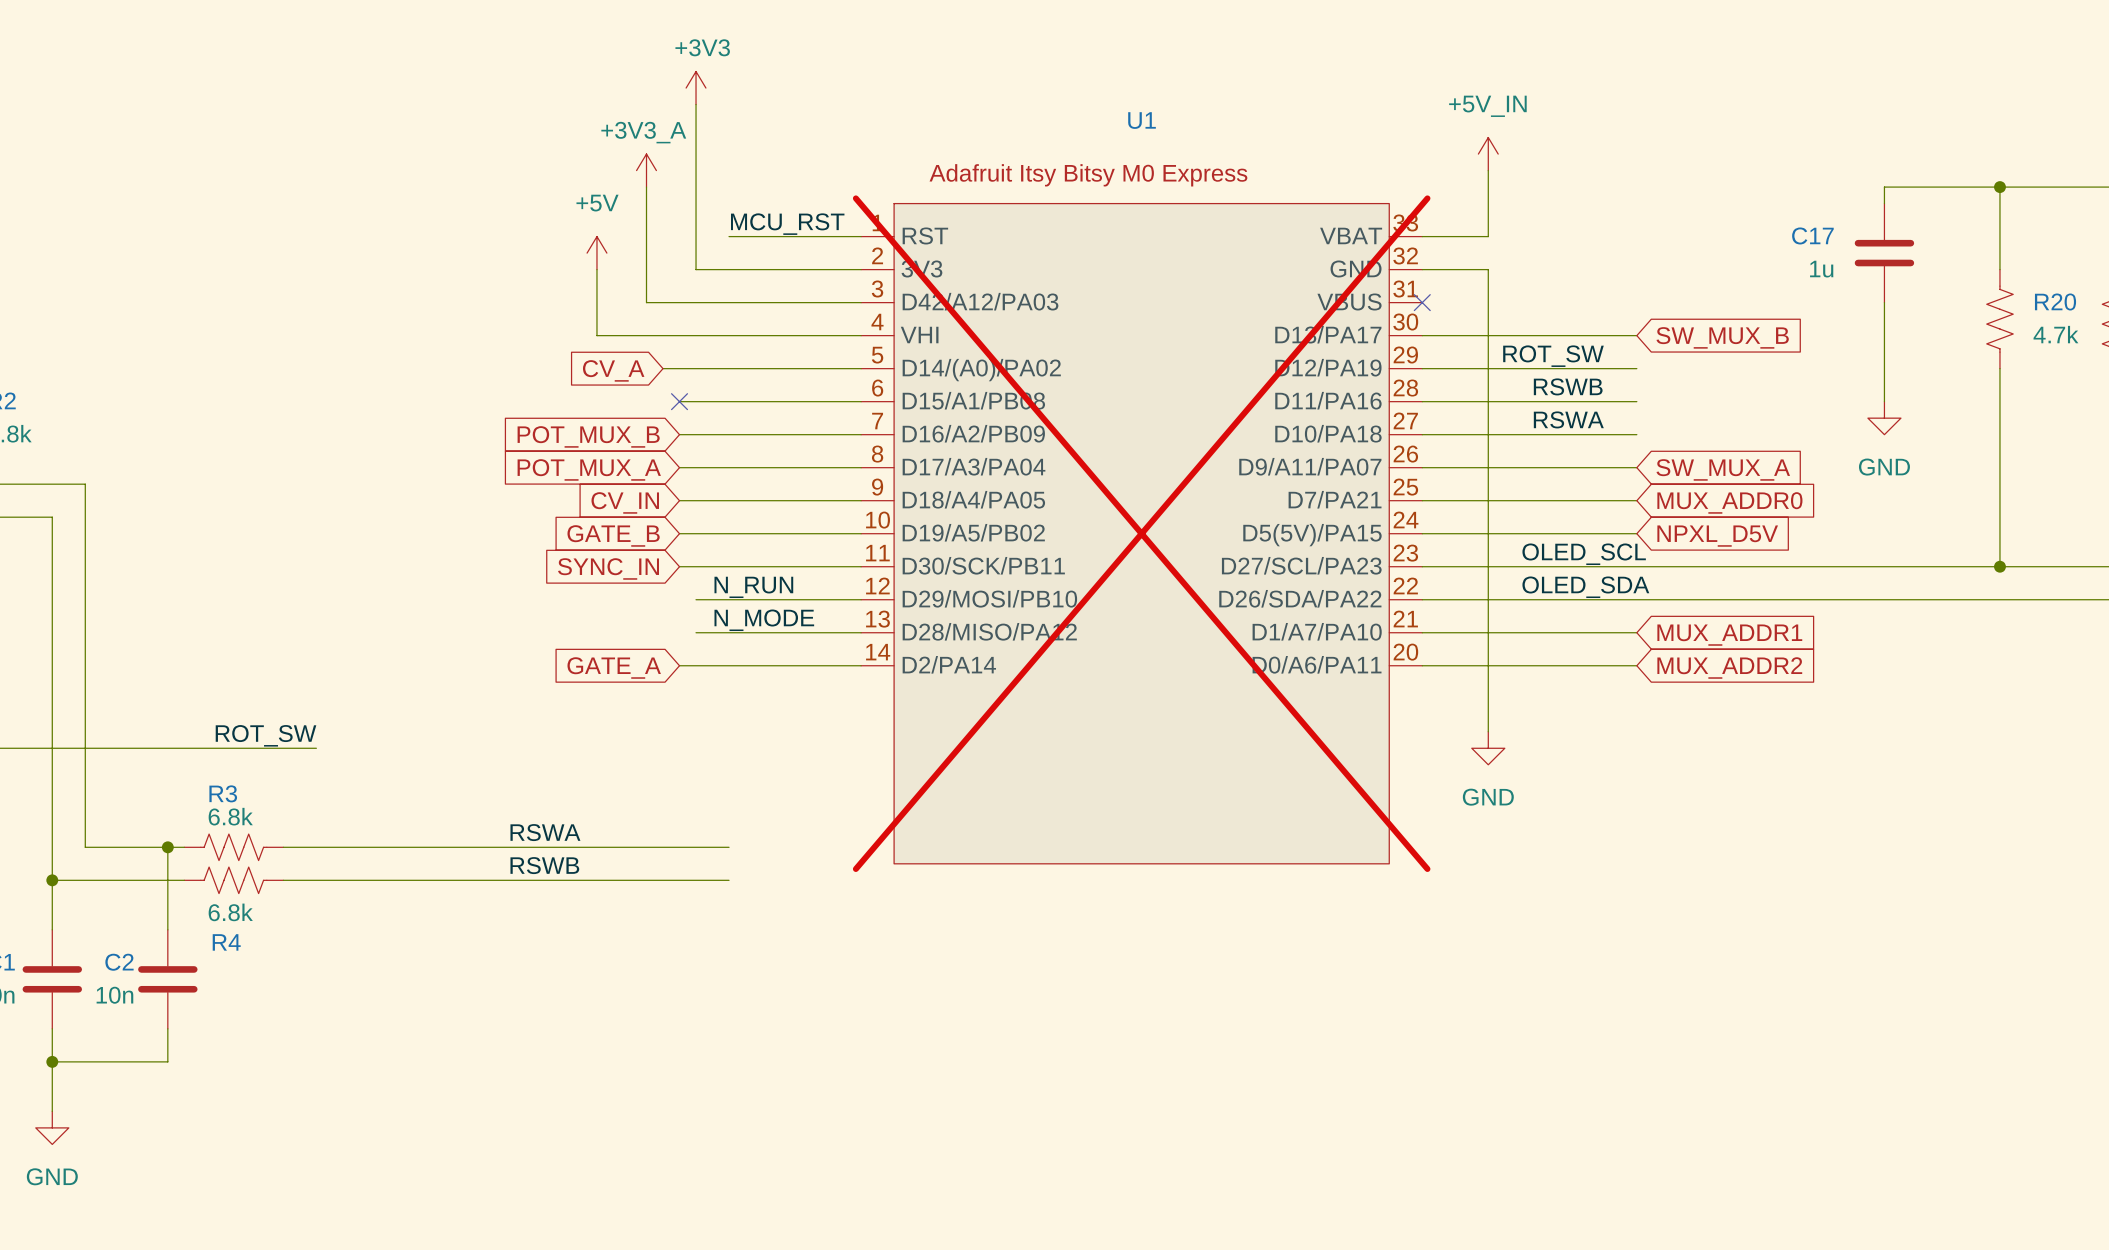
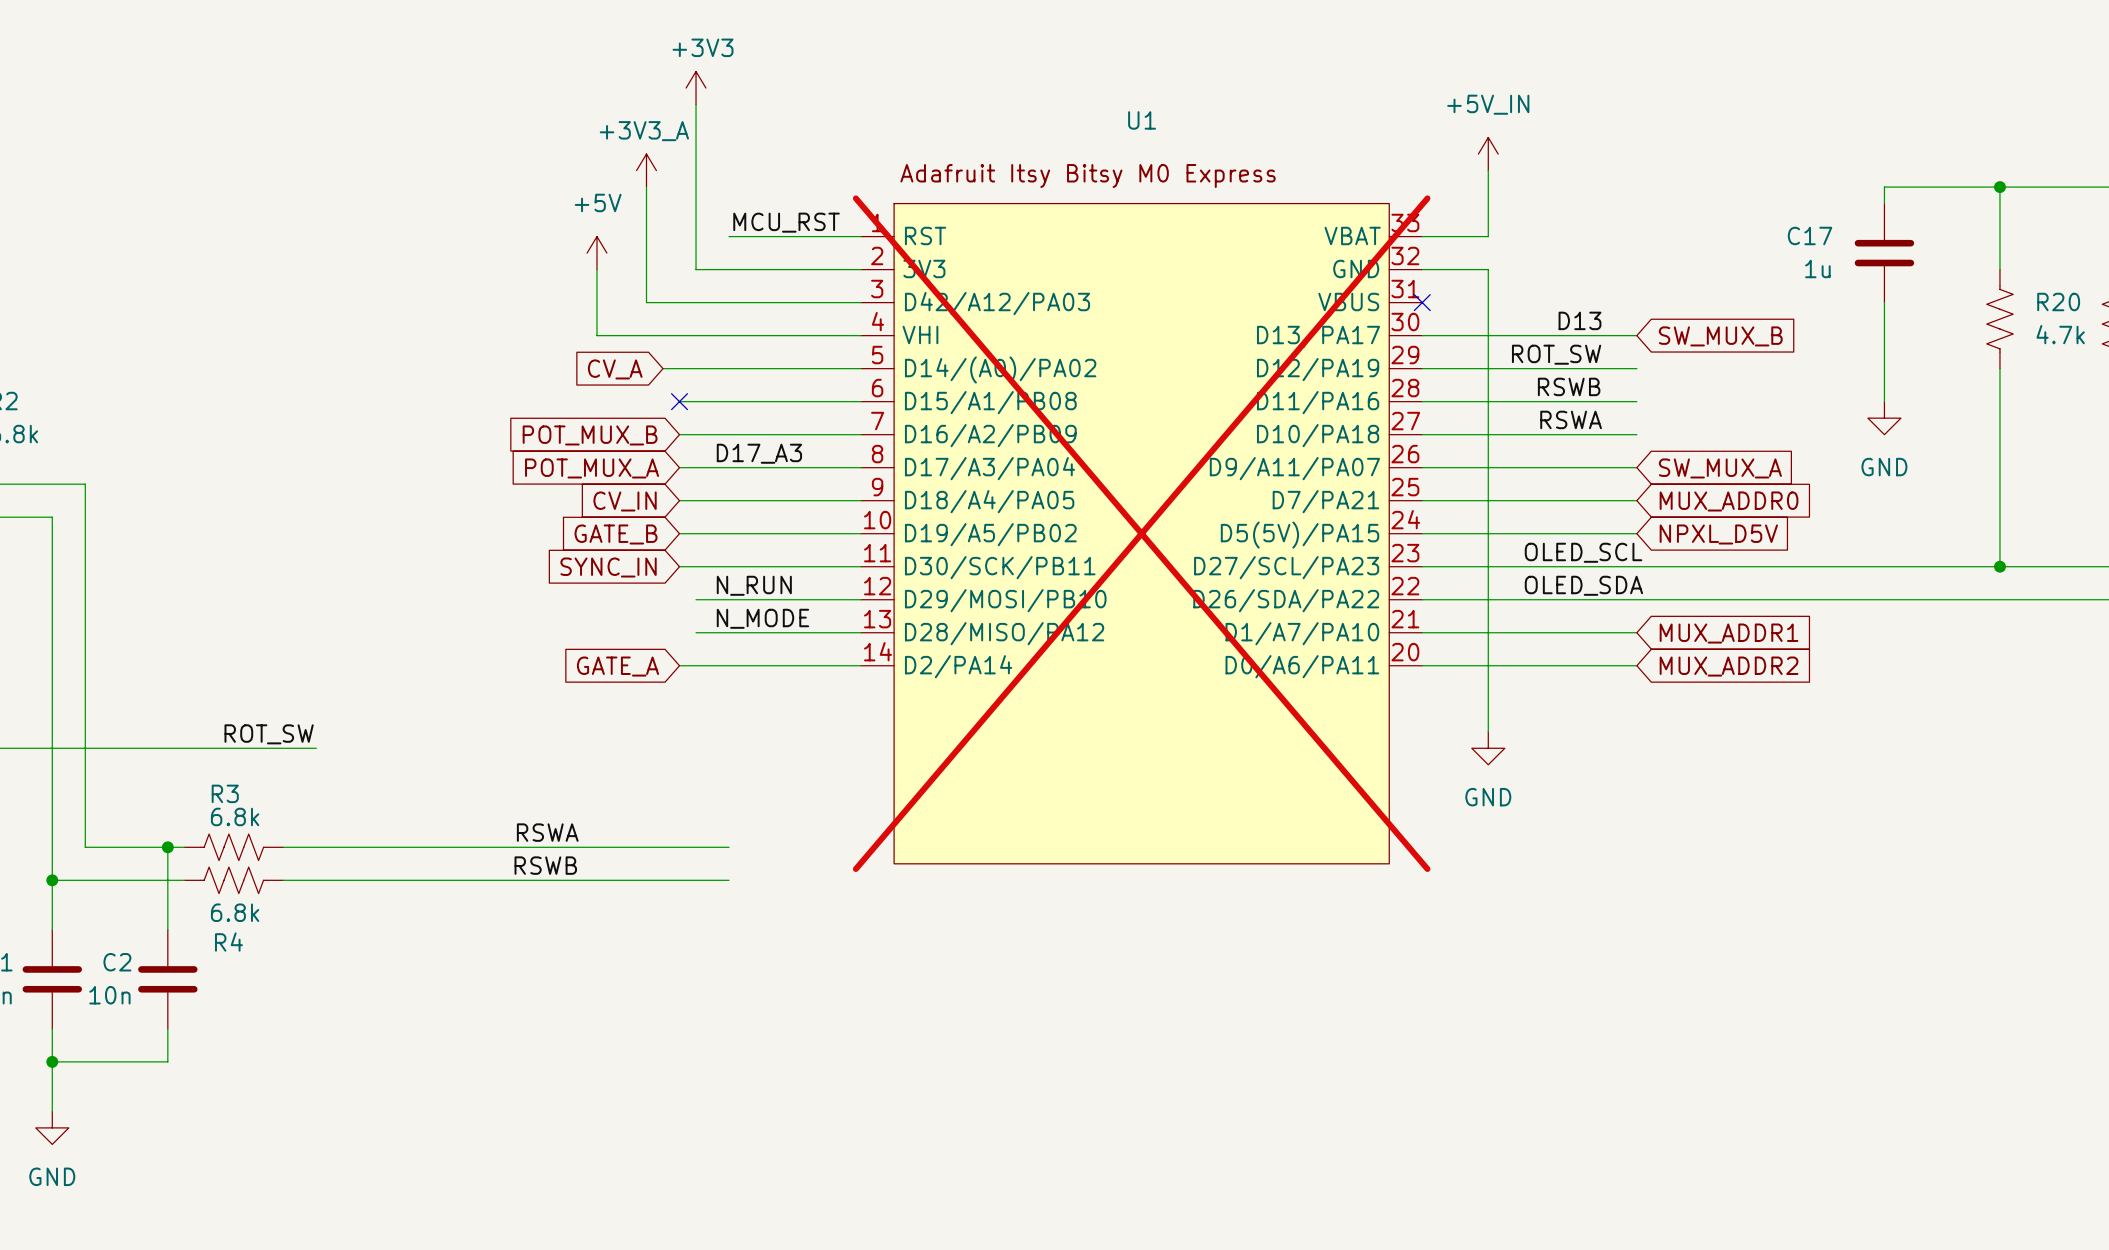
label: none -> D13 (1579, 320)
label: none -> D17_A3 (759, 453)

